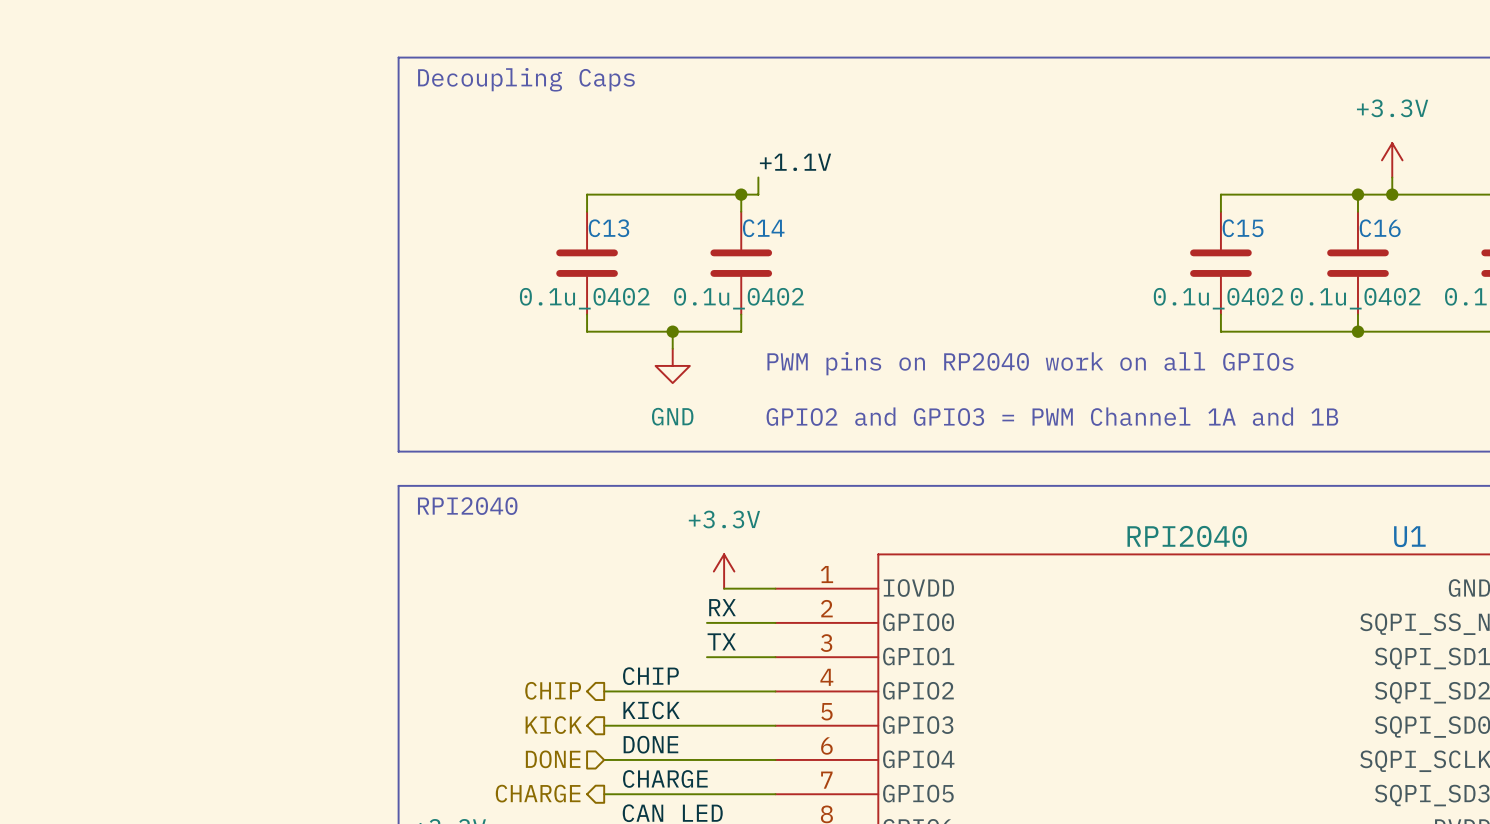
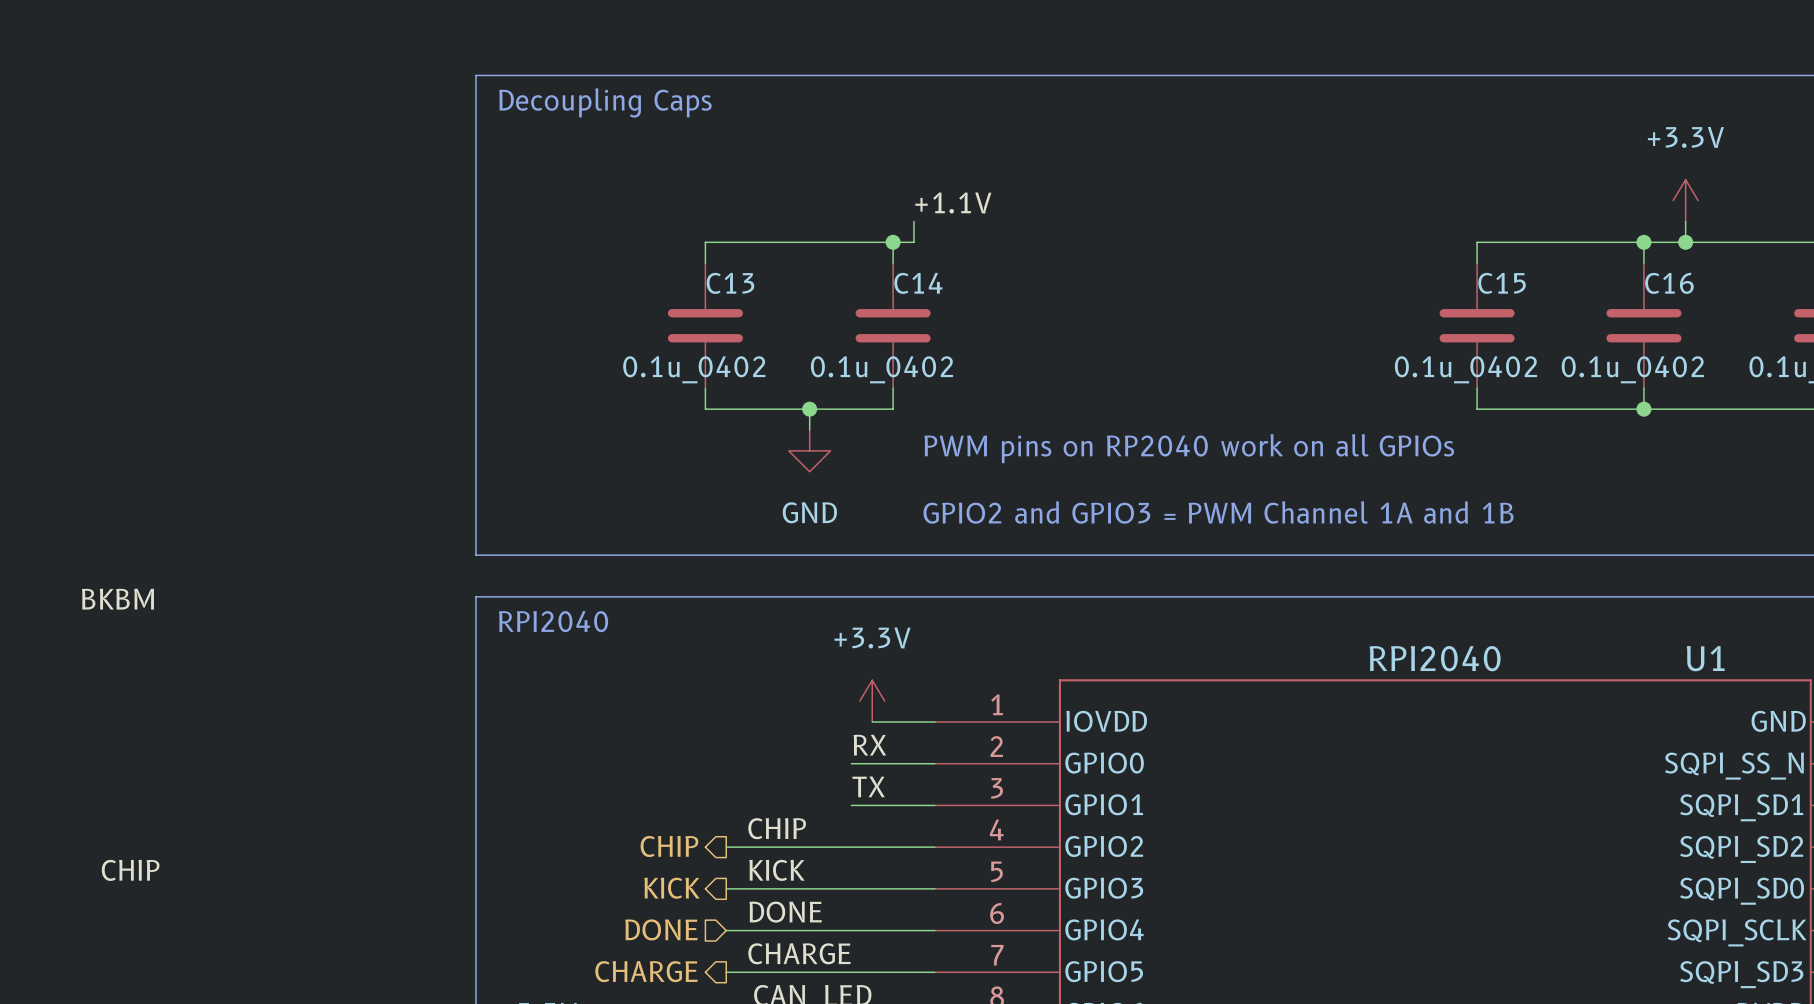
label: none -> BKBM (117, 599)
label: none -> CHIP (130, 870)

